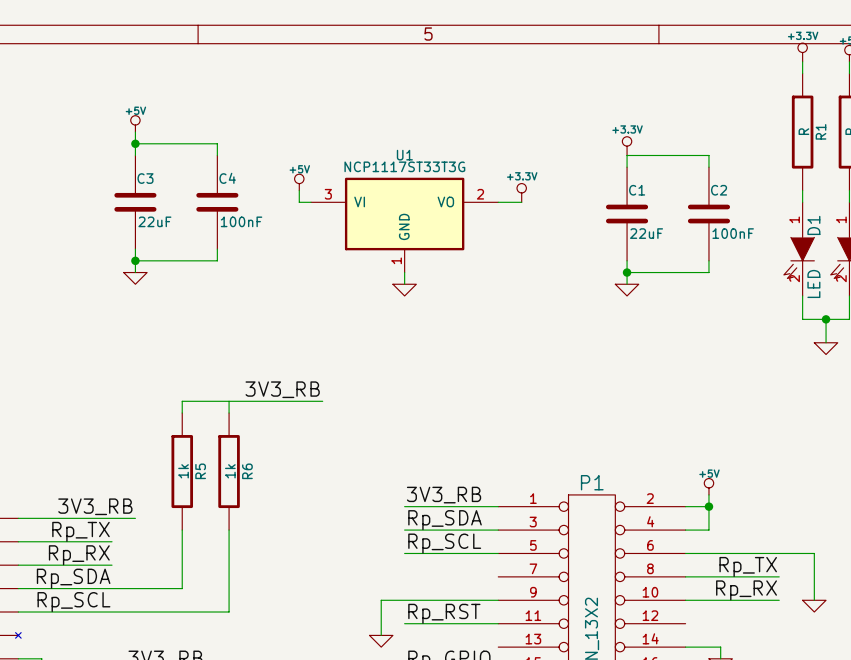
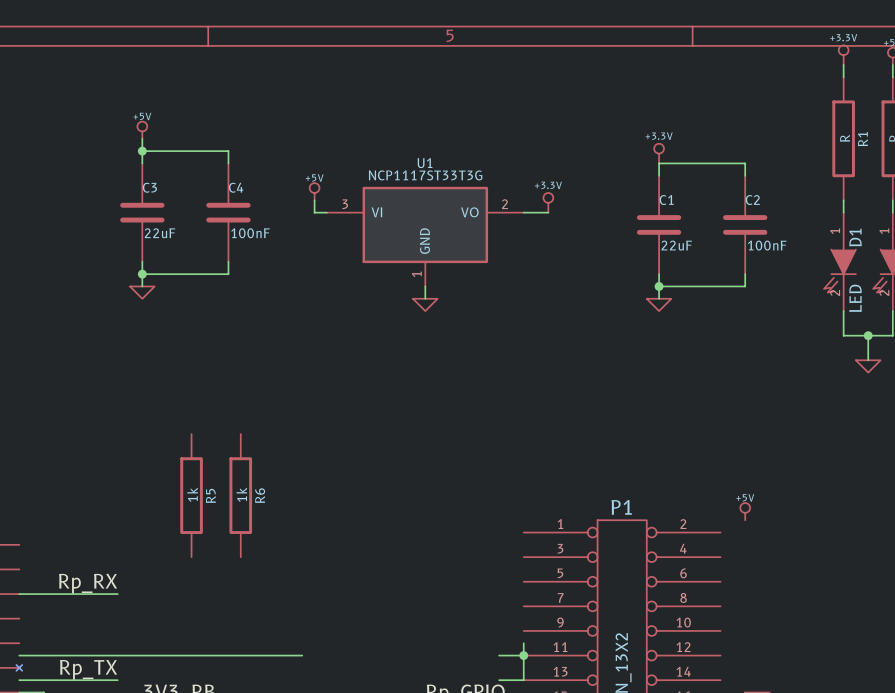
label: 3V3_RB (282, 389) -> none
wire: (229, 401) (229, 413) -> none
wire: (322, 401) (182, 401) (182, 413) -> none
wire: (708, 494) (708, 530) (685, 530) -> none
label: 3V3_RB (444, 495) -> none
label: 3V3_RB (95, 506) -> none
wire: (404, 506) (498, 506) -> none
wire: (685, 506) (708, 506) -> none
junction: (708, 506) -> none
wire: (18, 518) (135, 518) -> none
label: Rp_SDA (445, 520) -> none
wire: (182, 530) (182, 588) (18, 588) -> none
wire: (229, 530) (229, 612) (18, 612) -> none
wire: (404, 530) (498, 530) -> none
label position: Rp_TX (80, 531) -> Rp_TX (88, 669)
wire: (18, 541) (112, 541) -> (19, 680) (117, 680)
label: Rp_SCL (444, 543) -> none
wire: (404, 553) (498, 553) -> none
wire: (685, 553) (814, 553) (814, 600) -> none
label: Rp_TX (748, 566) -> none
wire: (685, 576) (779, 576) -> none
label: Rp_SDA (73, 578) -> none
label: Rp_RX (746, 590) -> none
wire: (498, 600) (381, 600) (381, 635) -> none
wire: (685, 600) (779, 600) -> none
label: Rp_SCL (73, 602) -> none
power symbol: (814, 606) -> none
wire: none -> (523, 643) (523, 680) (499, 680)
label: Rp_RST (444, 613) -> none
wire: none -> (19, 655) (302, 655)
wire: (404, 623) (474, 623) -> none
junction: none -> (523, 655)
power symbol: (381, 641) -> none
wire: (685, 647) (720, 647) (720, 658) -> none

